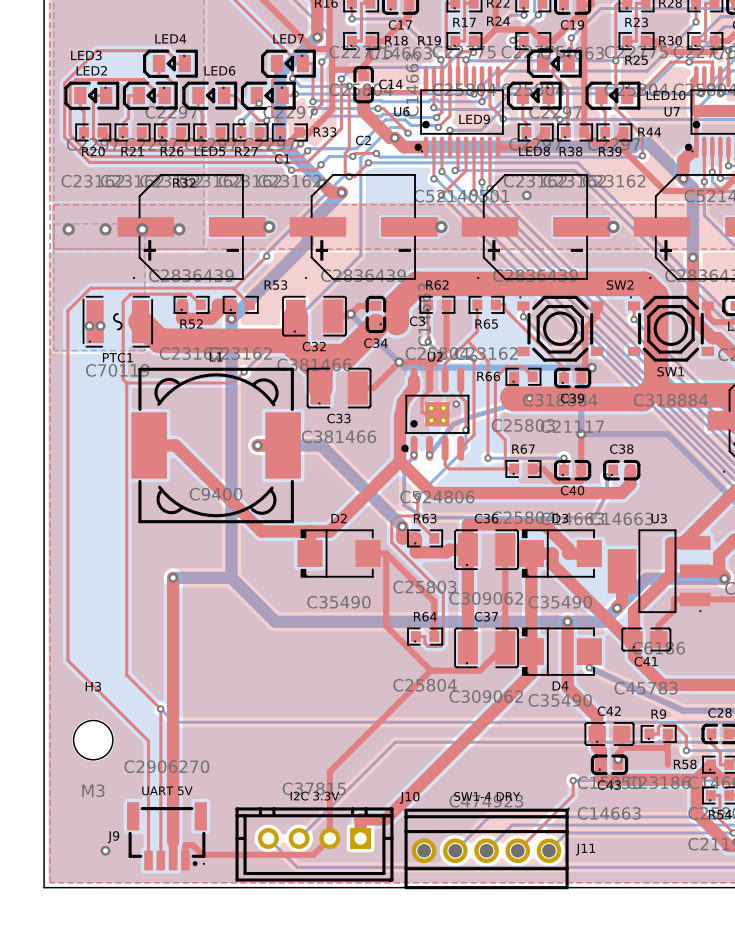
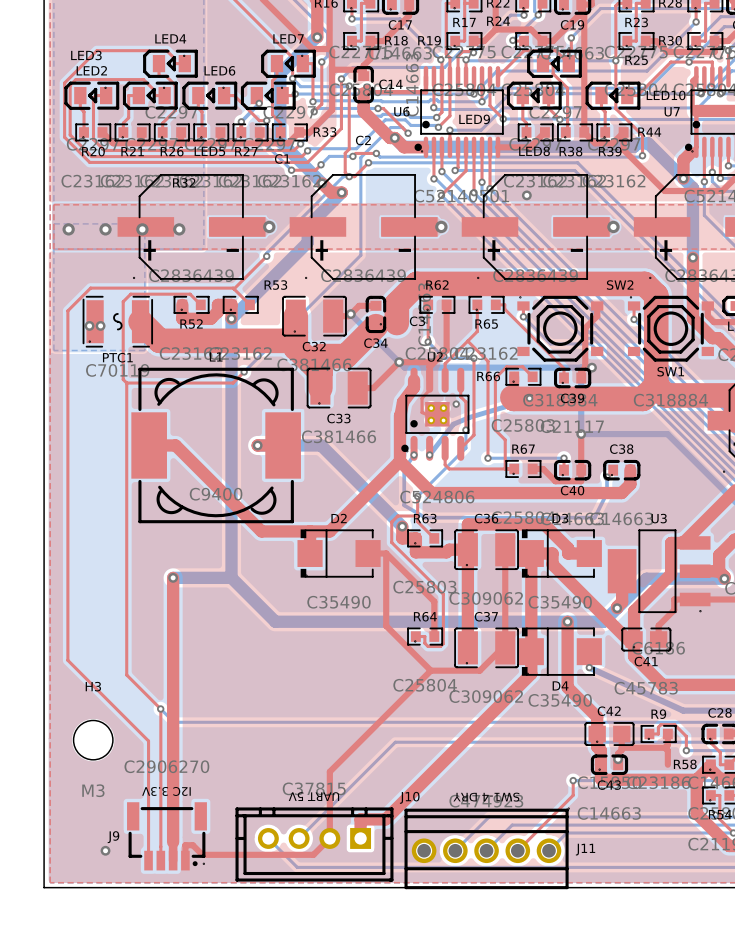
text: UART 5V (167, 790) -> I2C 3.3V (166, 791)
text: I2C 3.3V (314, 796) -> UART 5V (313, 796)
text rotation: 0° (487, 796) -> 180° (486, 797)

